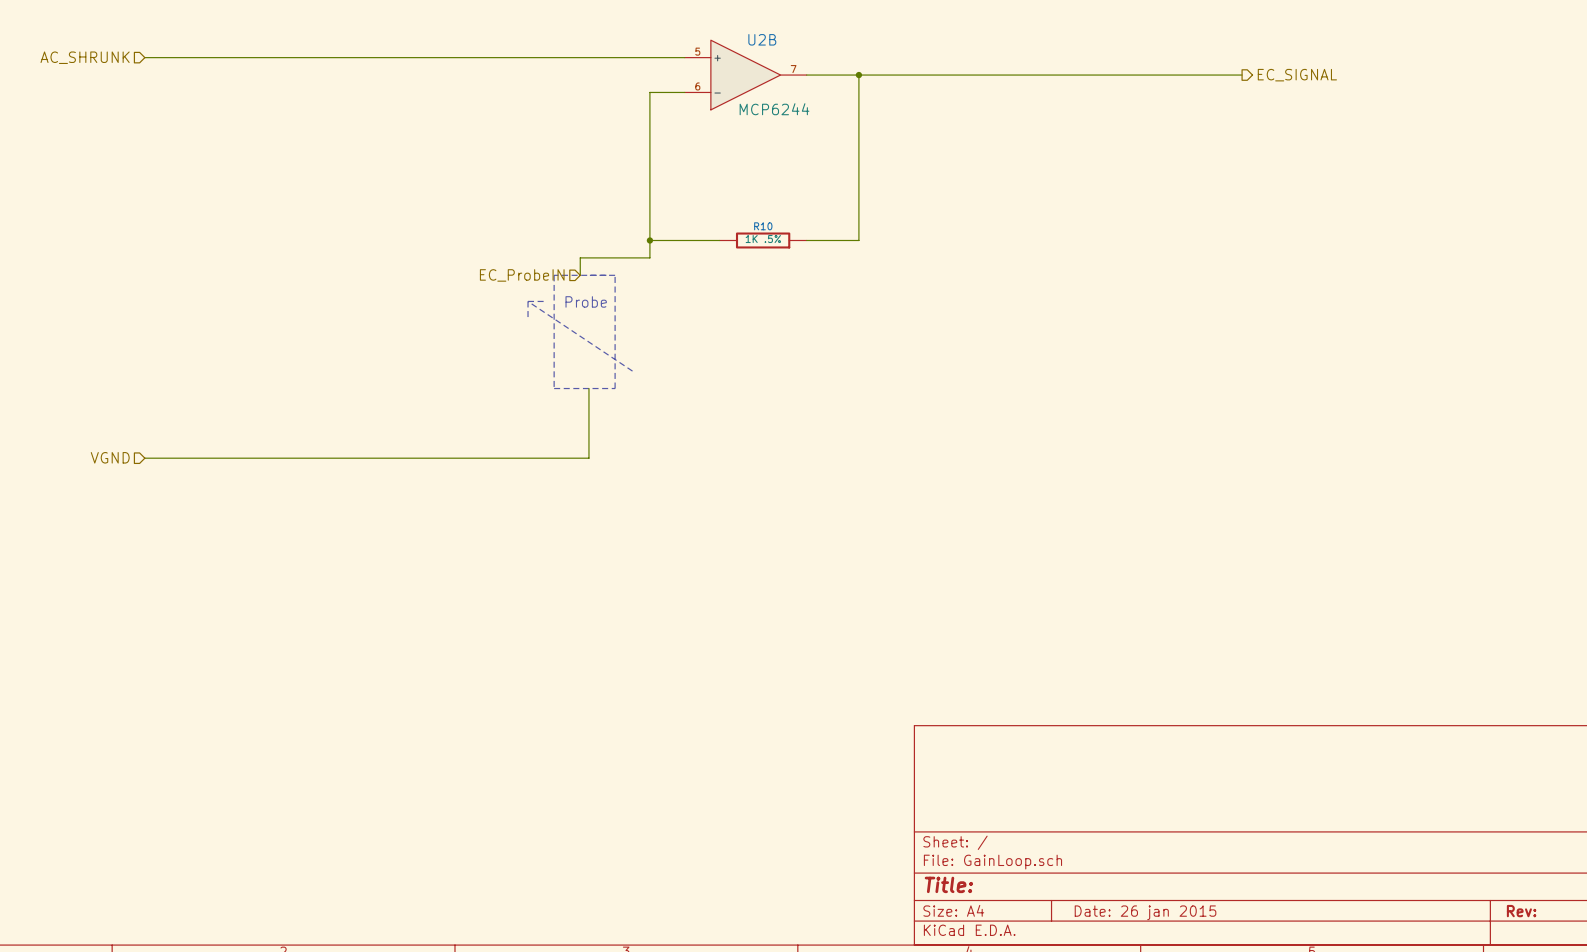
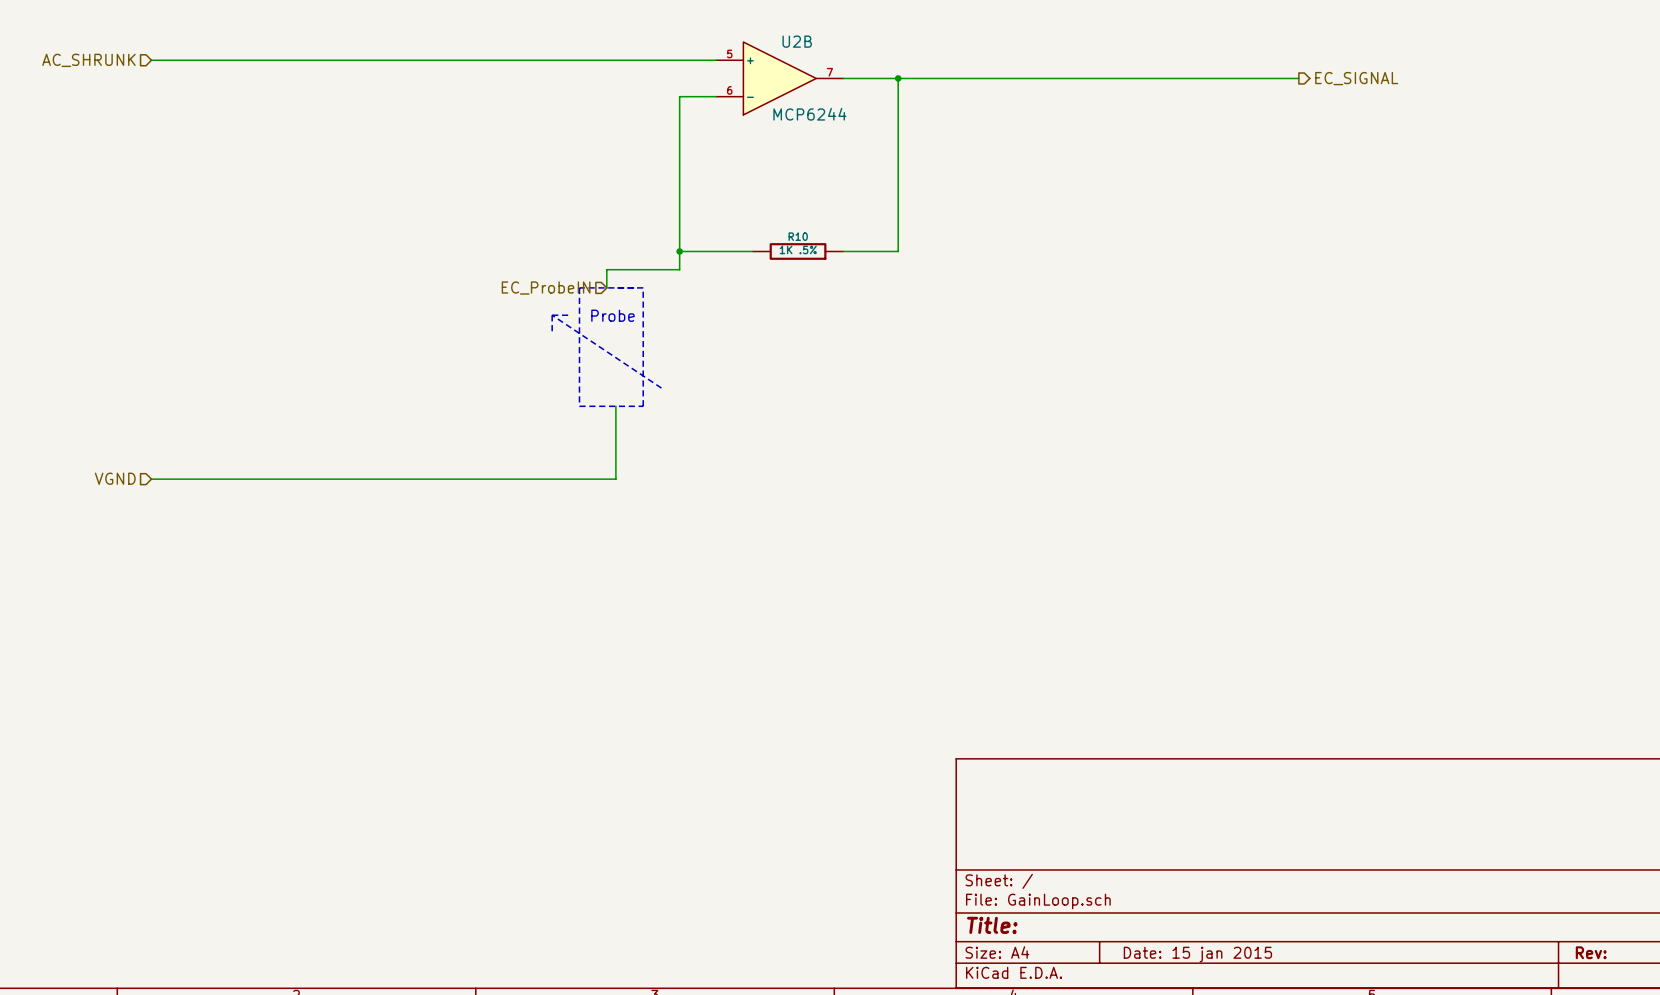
title block: Date: 26 jan 2015 (1145, 912) -> Date: 15 jan 2015 (1197, 954)

